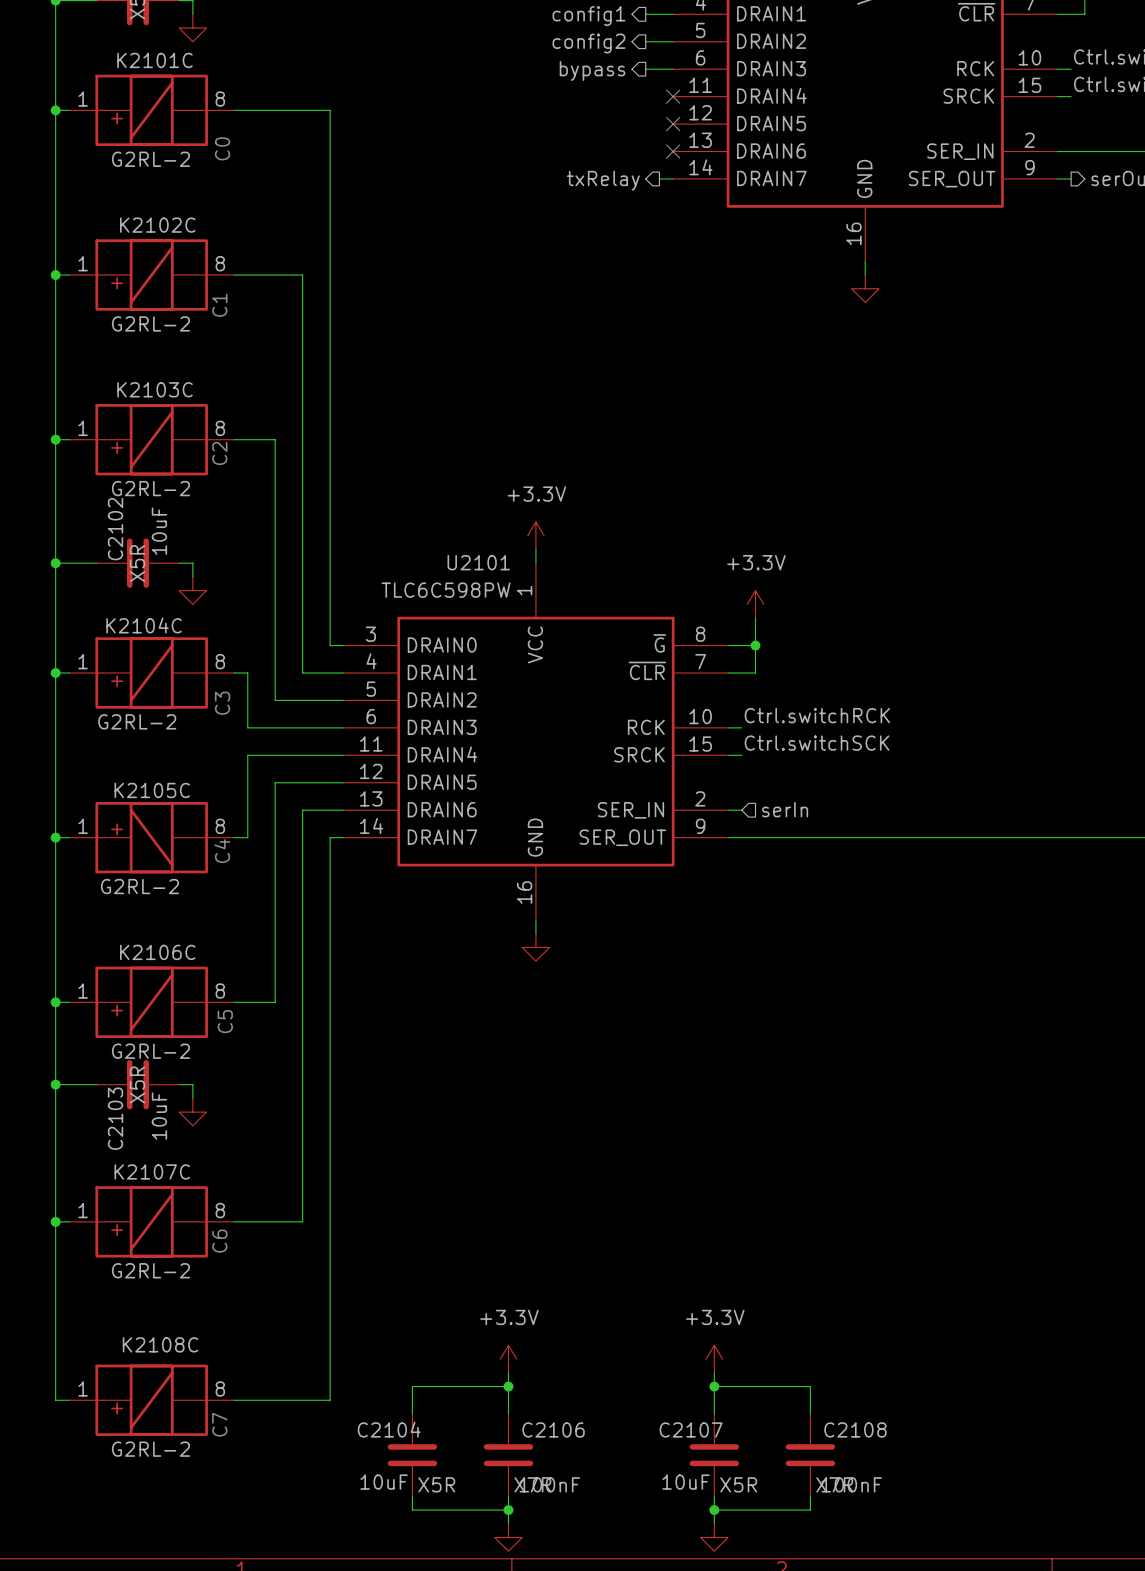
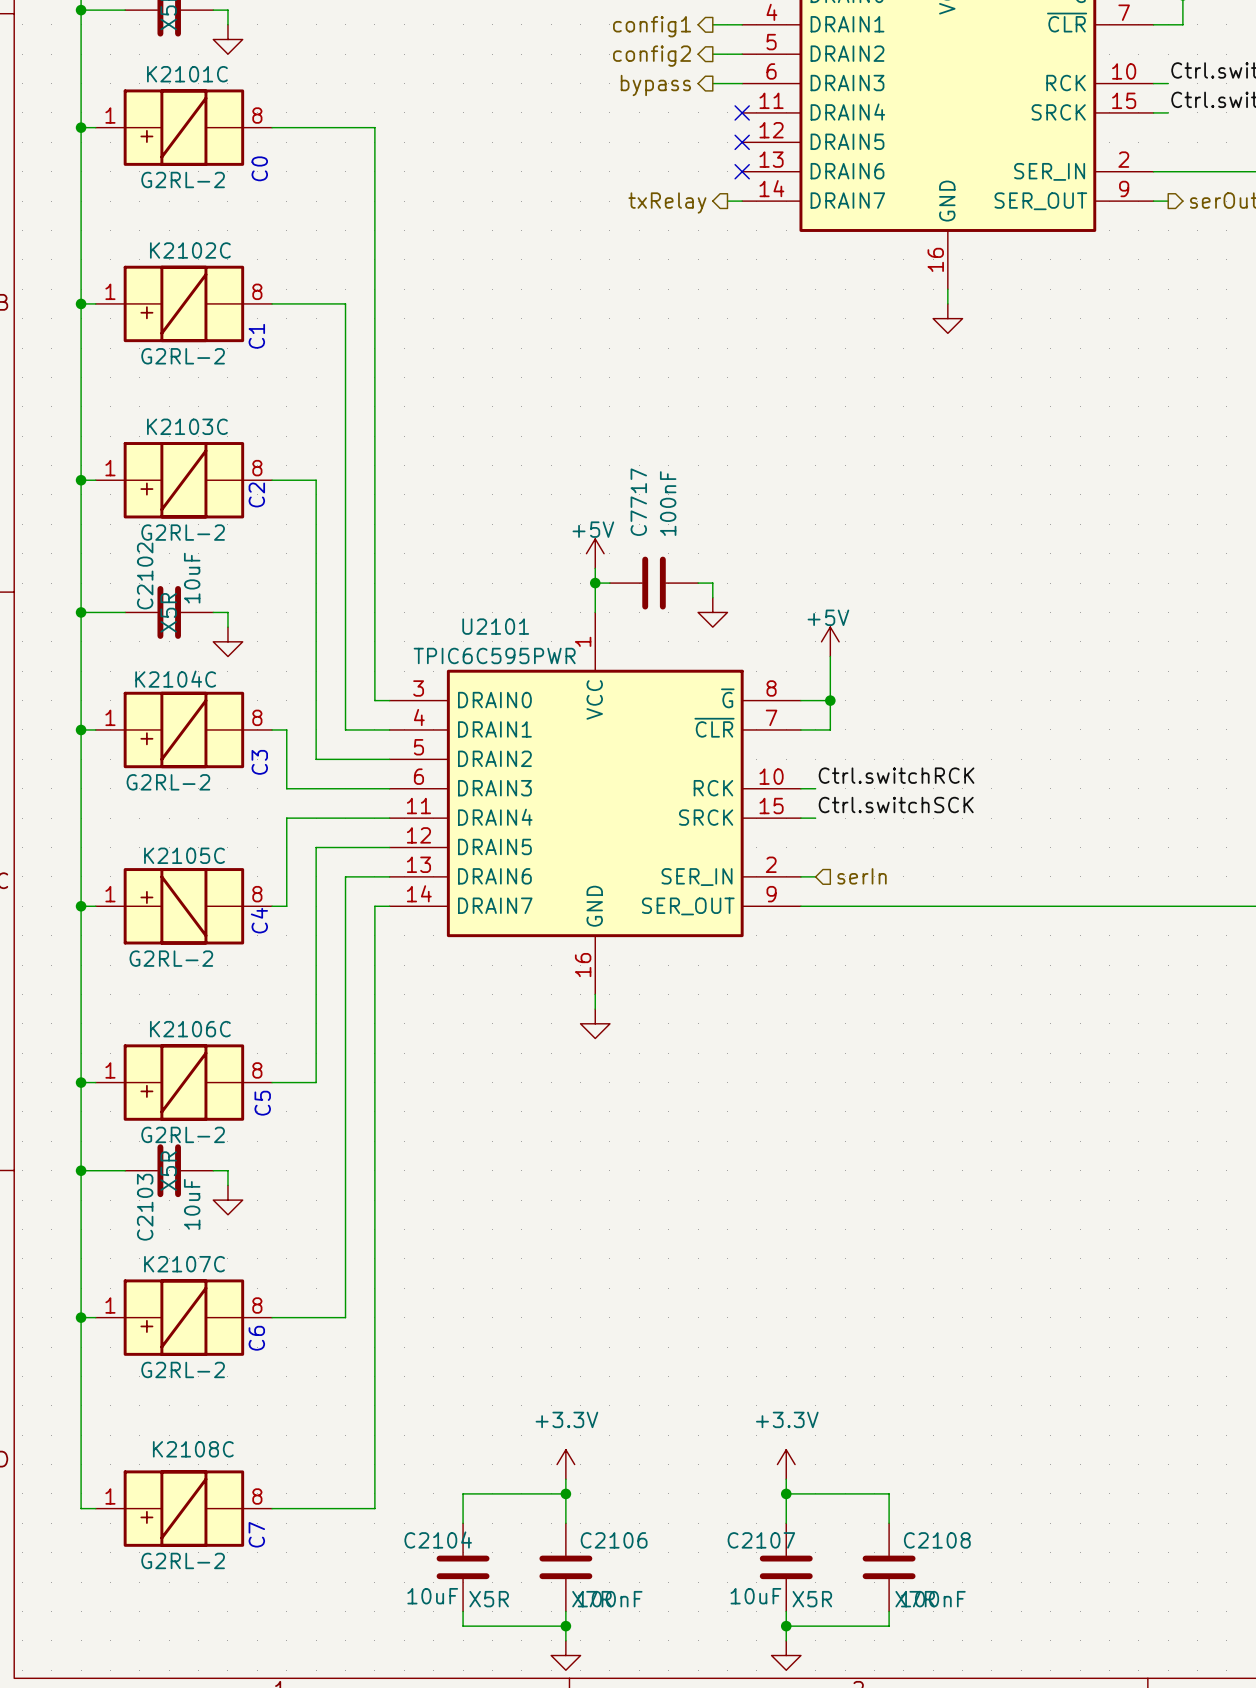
power symbol: none -> +5V (595, 553)
wire: none -> (595, 583) (609, 583)
power symbol: +3.3V (535, 535) -> none
junction: none -> (595, 583)
C7717: none -> 100nF (654, 583)
wire: none -> (698, 583) (712, 583) (712, 597)
U2101 name position: U2101 (478, 562) -> U2101 (495, 626)
power symbol: none -> (712, 612)
U2101 value: TLC6C598PW (446, 590) -> TPIC6C595PWR (494, 655)
power symbol: none -> +5V (830, 641)
power symbol: +3.3V (755, 604) -> none

